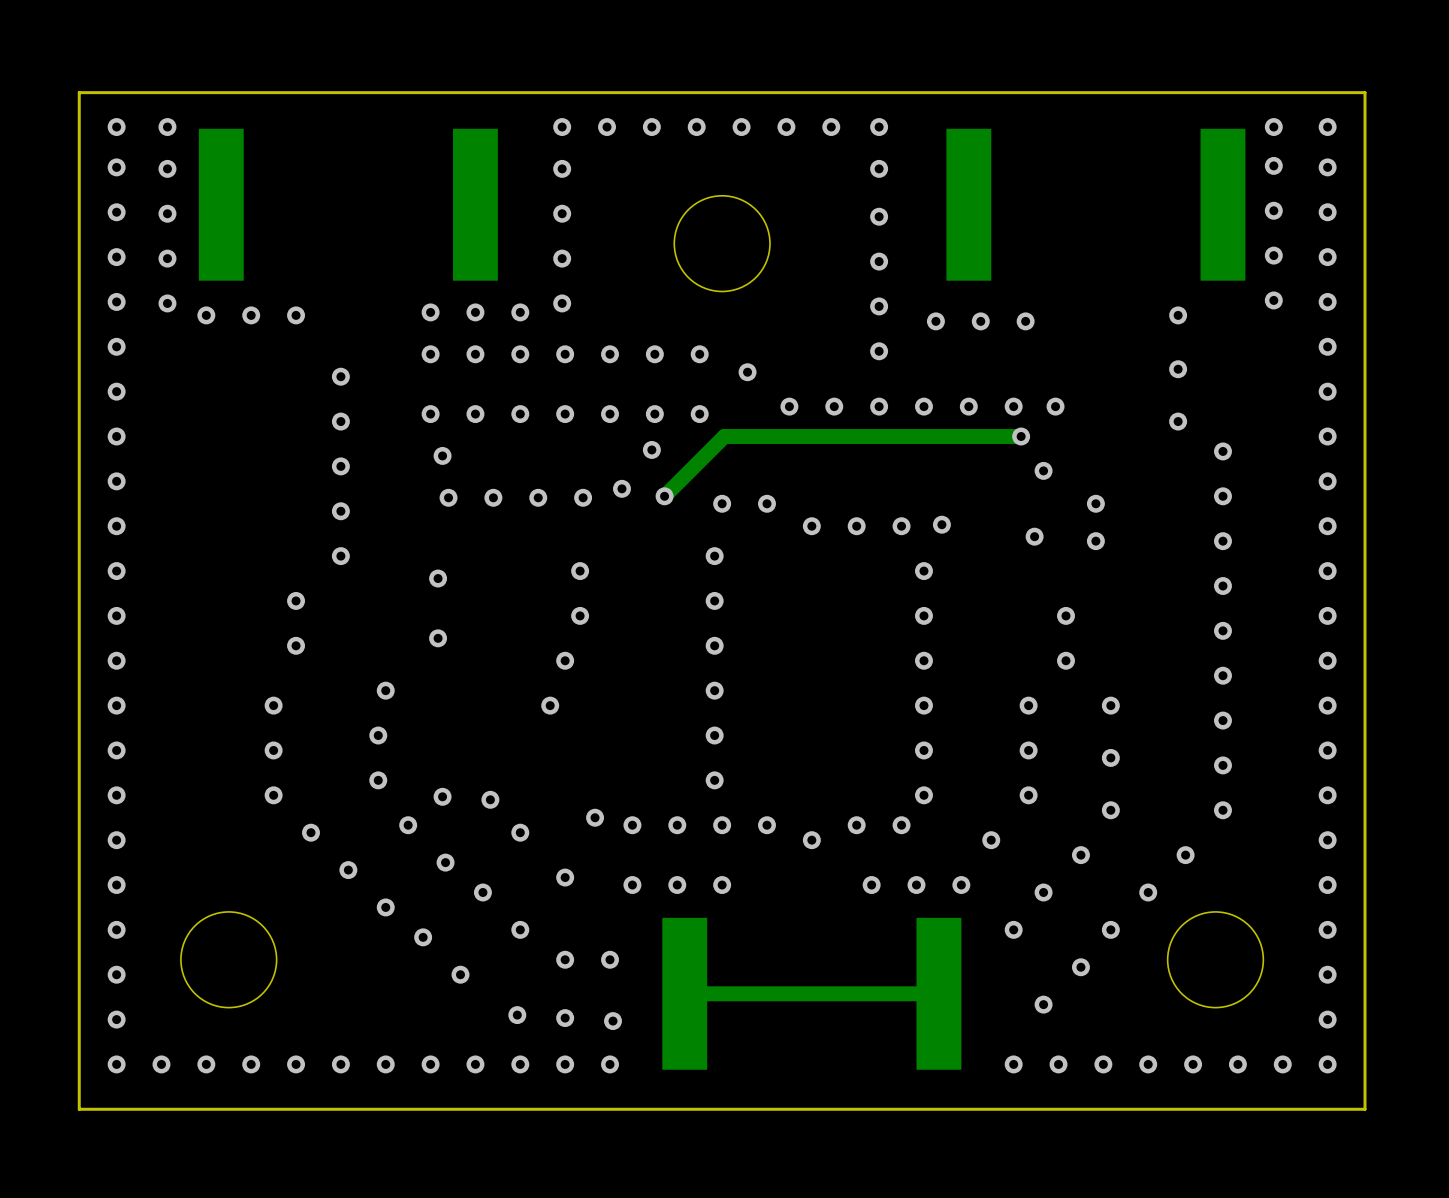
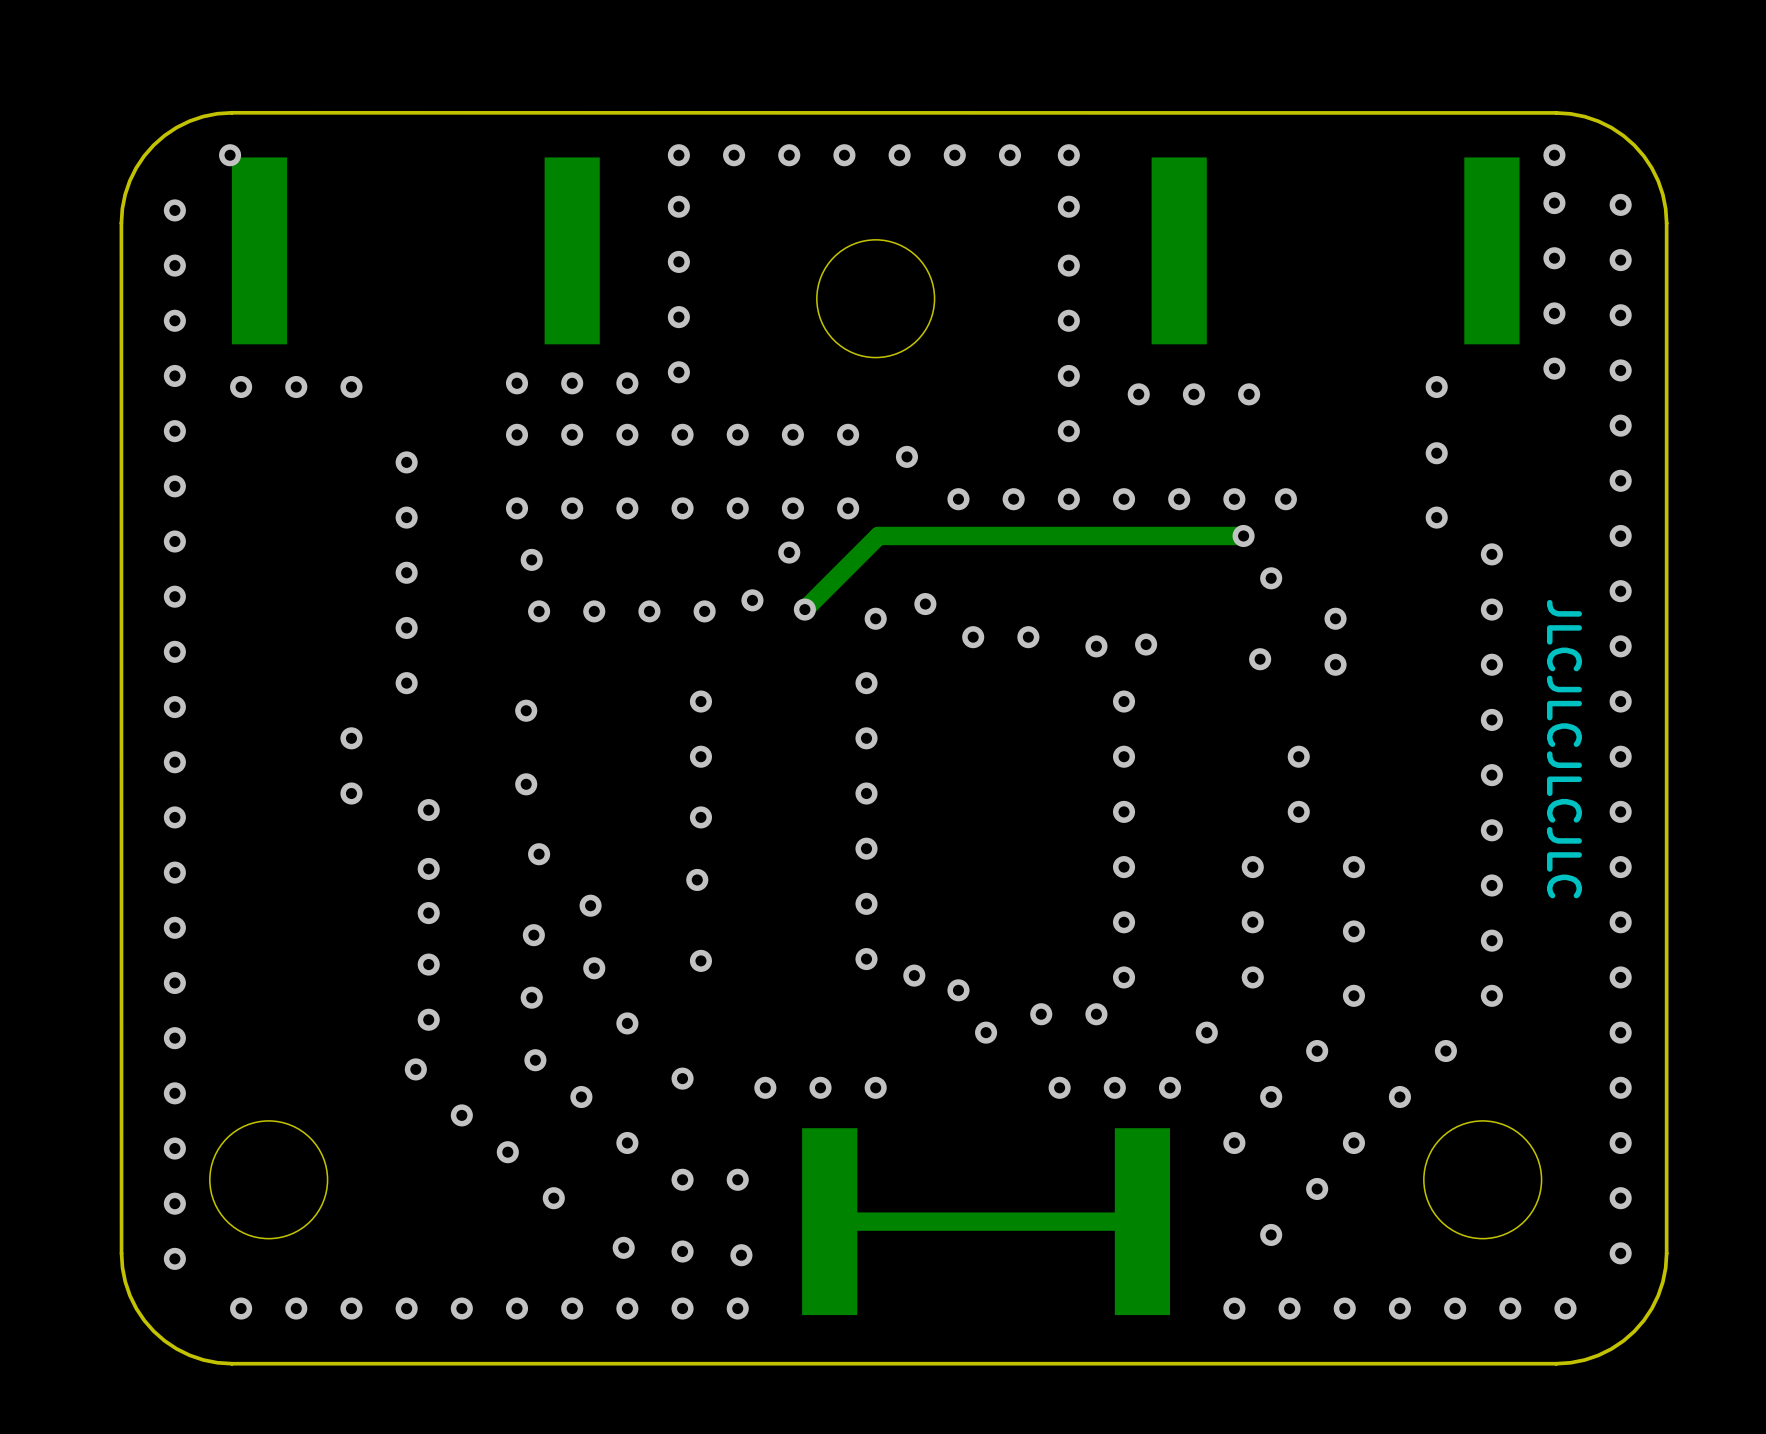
via: (116, 127) -> none
via: (167, 127) -> none
via: none -> (230, 155)
via: (1327, 127) -> none
via: (116, 167) -> none
via position: (167, 168) -> (174, 210)
board edge: (1365, 182) (1365, 92) (79, 92) (79, 1109) (198, 1109) -> (1666, 223) (1662, 194) (1658, 181) (1643, 156) (1634, 145) (1623, 135) (1598, 121) (1584, 116) (1556, 112) (231, 112) (203, 116) (176, 127) (164, 135) (153, 145) (136, 167) (125, 194) (121, 223) (121, 1253) (122, 1267) (129, 1295) (144, 1320) (153, 1331) (164, 1340) (189, 1355) (203, 1359) (231, 1363)
via: (116, 212) -> none
via position: (167, 213) -> (174, 265)
via: (116, 257) -> none
via position: (167, 258) -> (174, 320)
via: (116, 301) -> none
via position: (167, 303) -> (174, 375)
via: (116, 346) -> none
via: none -> (174, 431)
via: (116, 391) -> none
via: none -> (174, 486)
via: (116, 436) -> none
via: none -> (174, 541)
via: (116, 481) -> none
via: none -> (174, 596)
via position: (766, 503) -> (925, 604)
via: (116, 526) -> none
via position: (811, 526) -> (973, 637)
via position: (856, 526) -> (1028, 637)
via: none -> (174, 651)
via: (116, 571) -> none
via: none -> (174, 707)
text: none -> JLCJLCJLCJLC (1564, 749)
via: (116, 615) -> none
via: none -> (174, 762)
via: none -> (428, 810)
via: (116, 660) -> none
via position: (565, 660) -> (700, 817)
via: none -> (174, 817)
via: (385, 690) -> none
via: none -> (539, 854)
via: (116, 705) -> none
via: (273, 705) -> none
via: (550, 705) -> none
via: none -> (428, 868)
via: none -> (174, 872)
via: none -> (697, 879)
via: (378, 735) -> none
via: none -> (590, 905)
via: none -> (428, 913)
via: (116, 750) -> none
via: (273, 750) -> none
via: none -> (174, 927)
via: none -> (533, 935)
via position: (378, 780) -> (428, 964)
via: none -> (700, 960)
via: none -> (914, 975)
via: (116, 795) -> none
via: (273, 795) -> none
via position: (442, 796) -> (531, 997)
via: none -> (174, 982)
via position: (490, 799) -> (594, 968)
via: none -> (958, 990)
via: (595, 817) -> none
via: (408, 825) -> none
via: (632, 825) -> none
via: (677, 825) -> none
via: (722, 825) -> none
via: (766, 825) -> none
via: none -> (428, 1019)
via: (310, 832) -> none
via: (116, 840) -> none
via: none -> (174, 1038)
via: (116, 885) -> none
via: none -> (174, 1093)
via: (116, 929) -> none
via: none -> (174, 1148)
via: (116, 974) -> none
via: none -> (174, 1203)
via: (116, 1019) -> none
board edge: (1365, 1019) (1365, 1109) (1275, 1109) -> (1666, 1253) (1665, 1267) (1658, 1295) (1651, 1308) (1634, 1331) (1623, 1340) (1598, 1355) (1584, 1359) (1556, 1363)
via: none -> (174, 1258)
via: (116, 1064) -> none
via: (161, 1064) -> none
via: (1327, 1064) -> none

